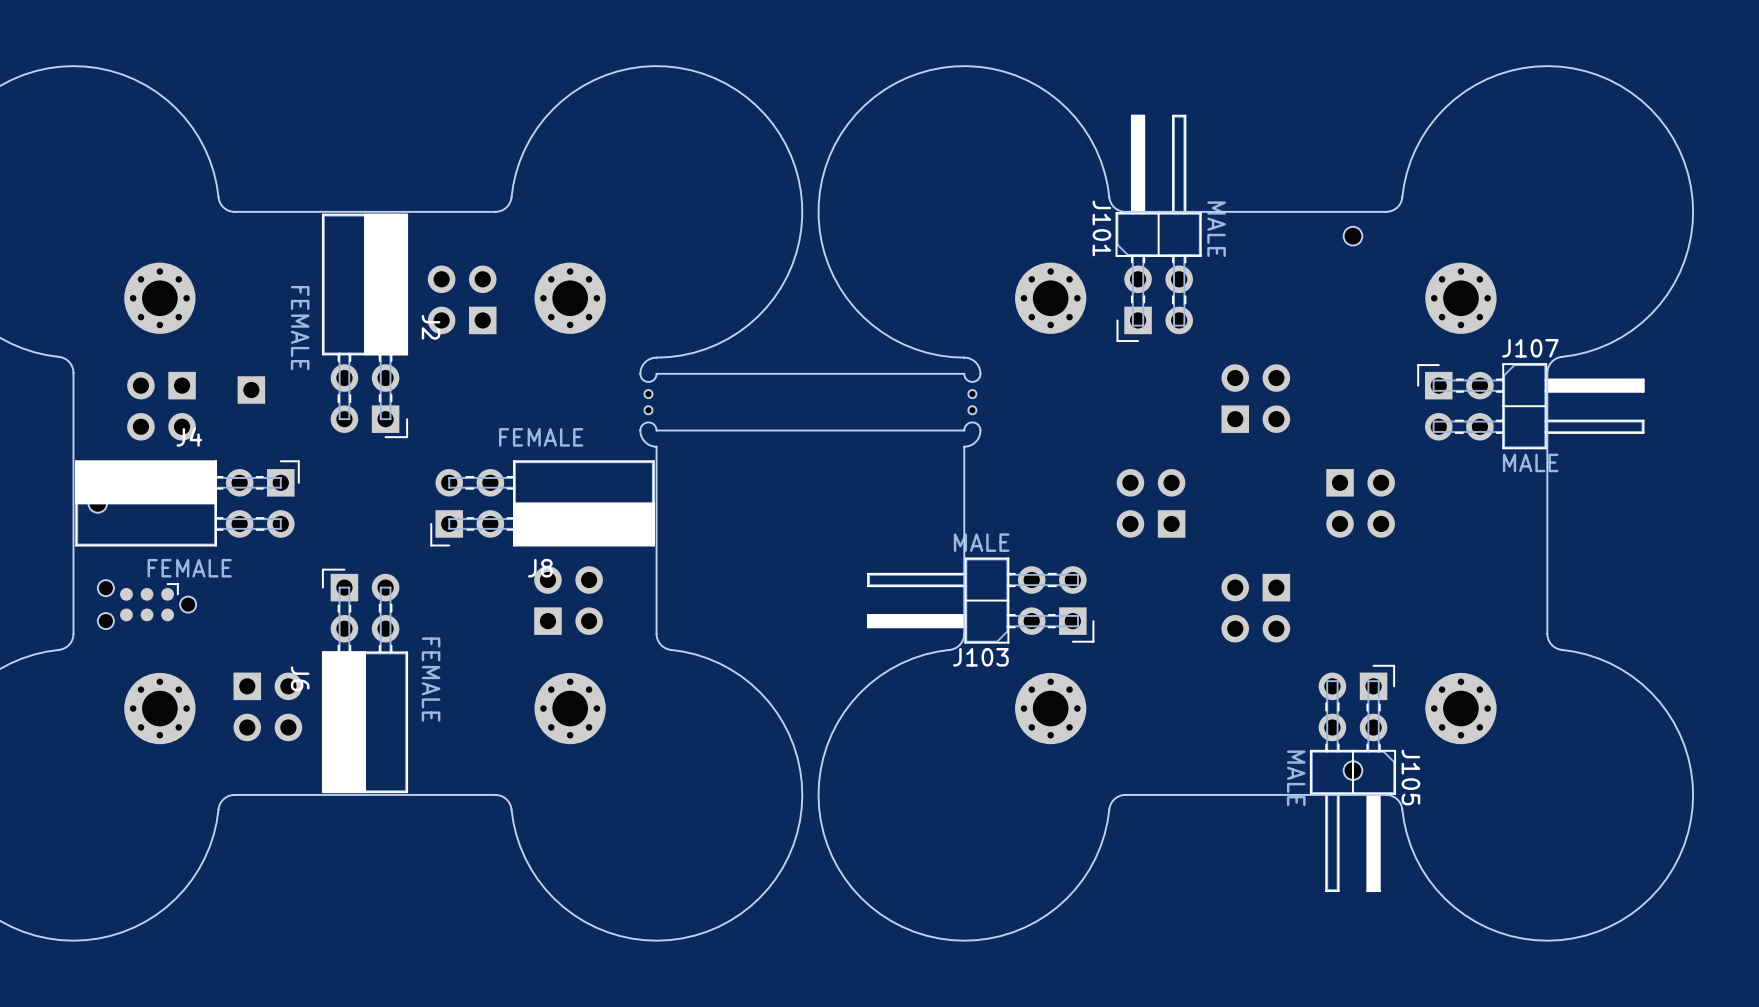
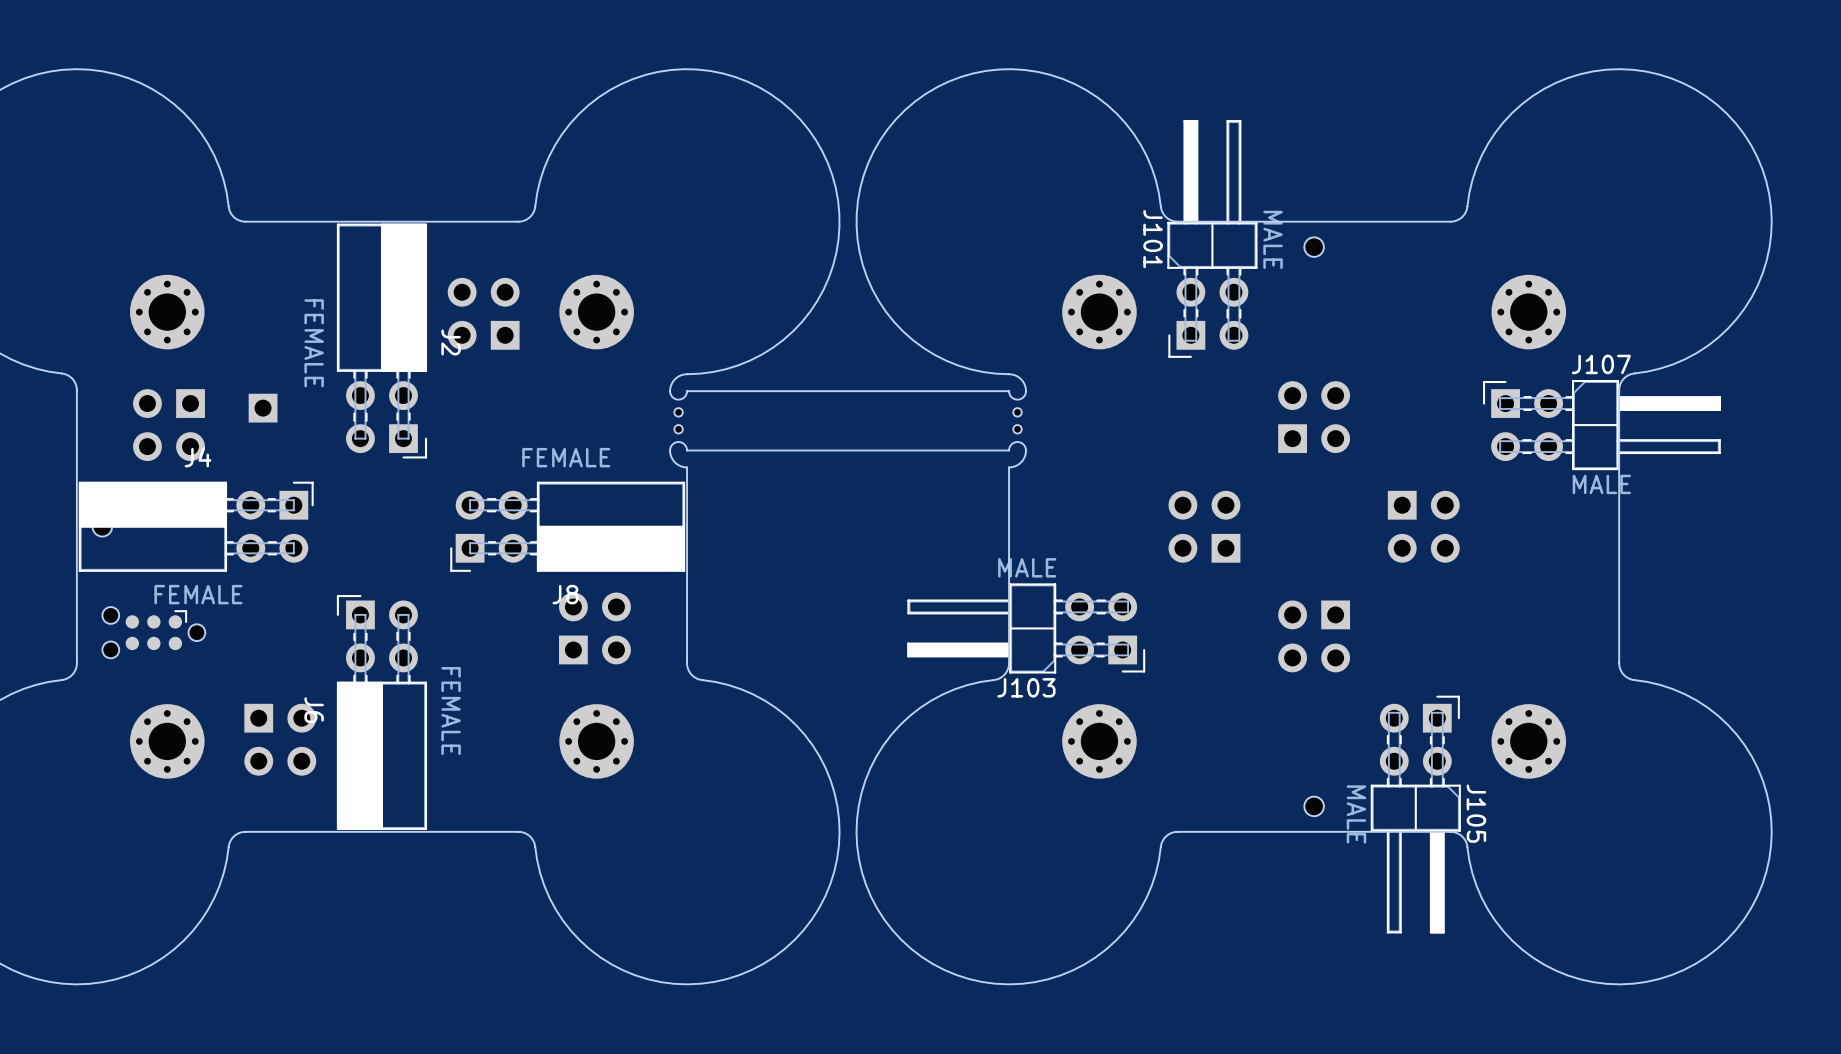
part position: (1352, 236) -> (1314, 247)
part position: (1352, 770) -> (1314, 806)

